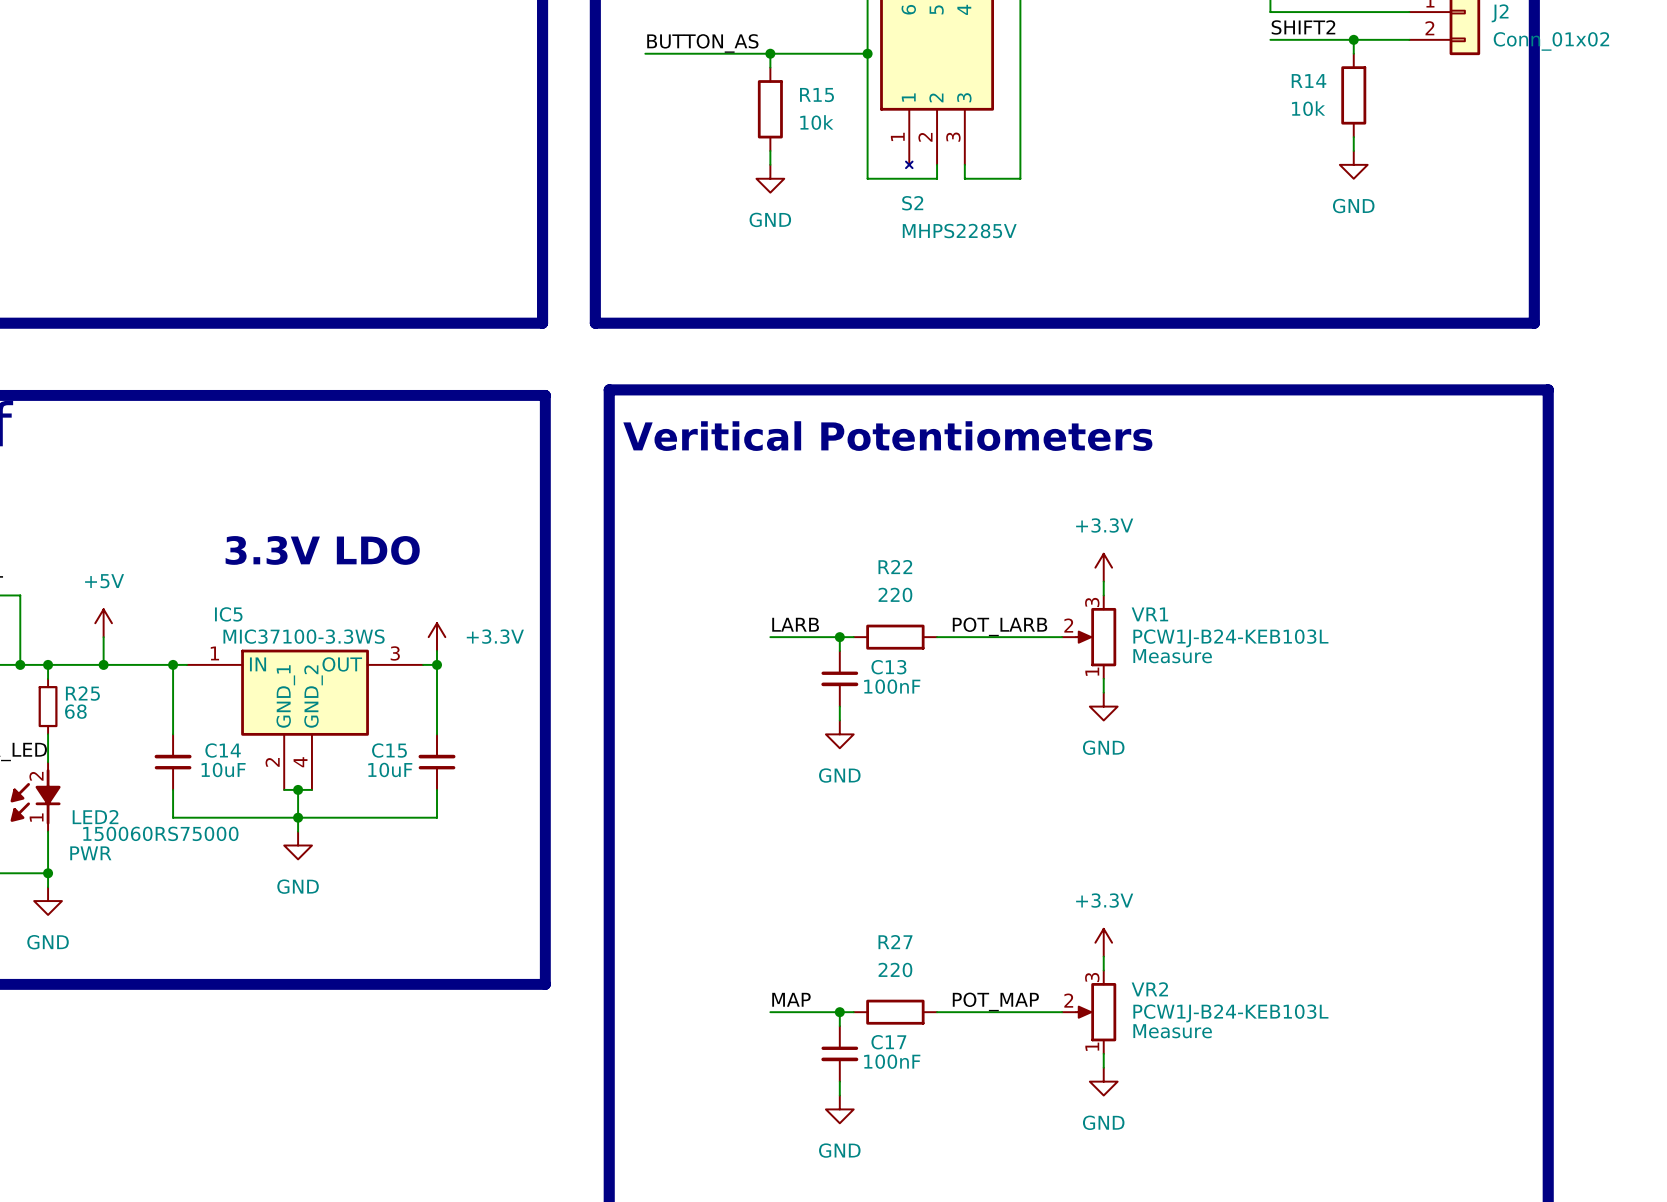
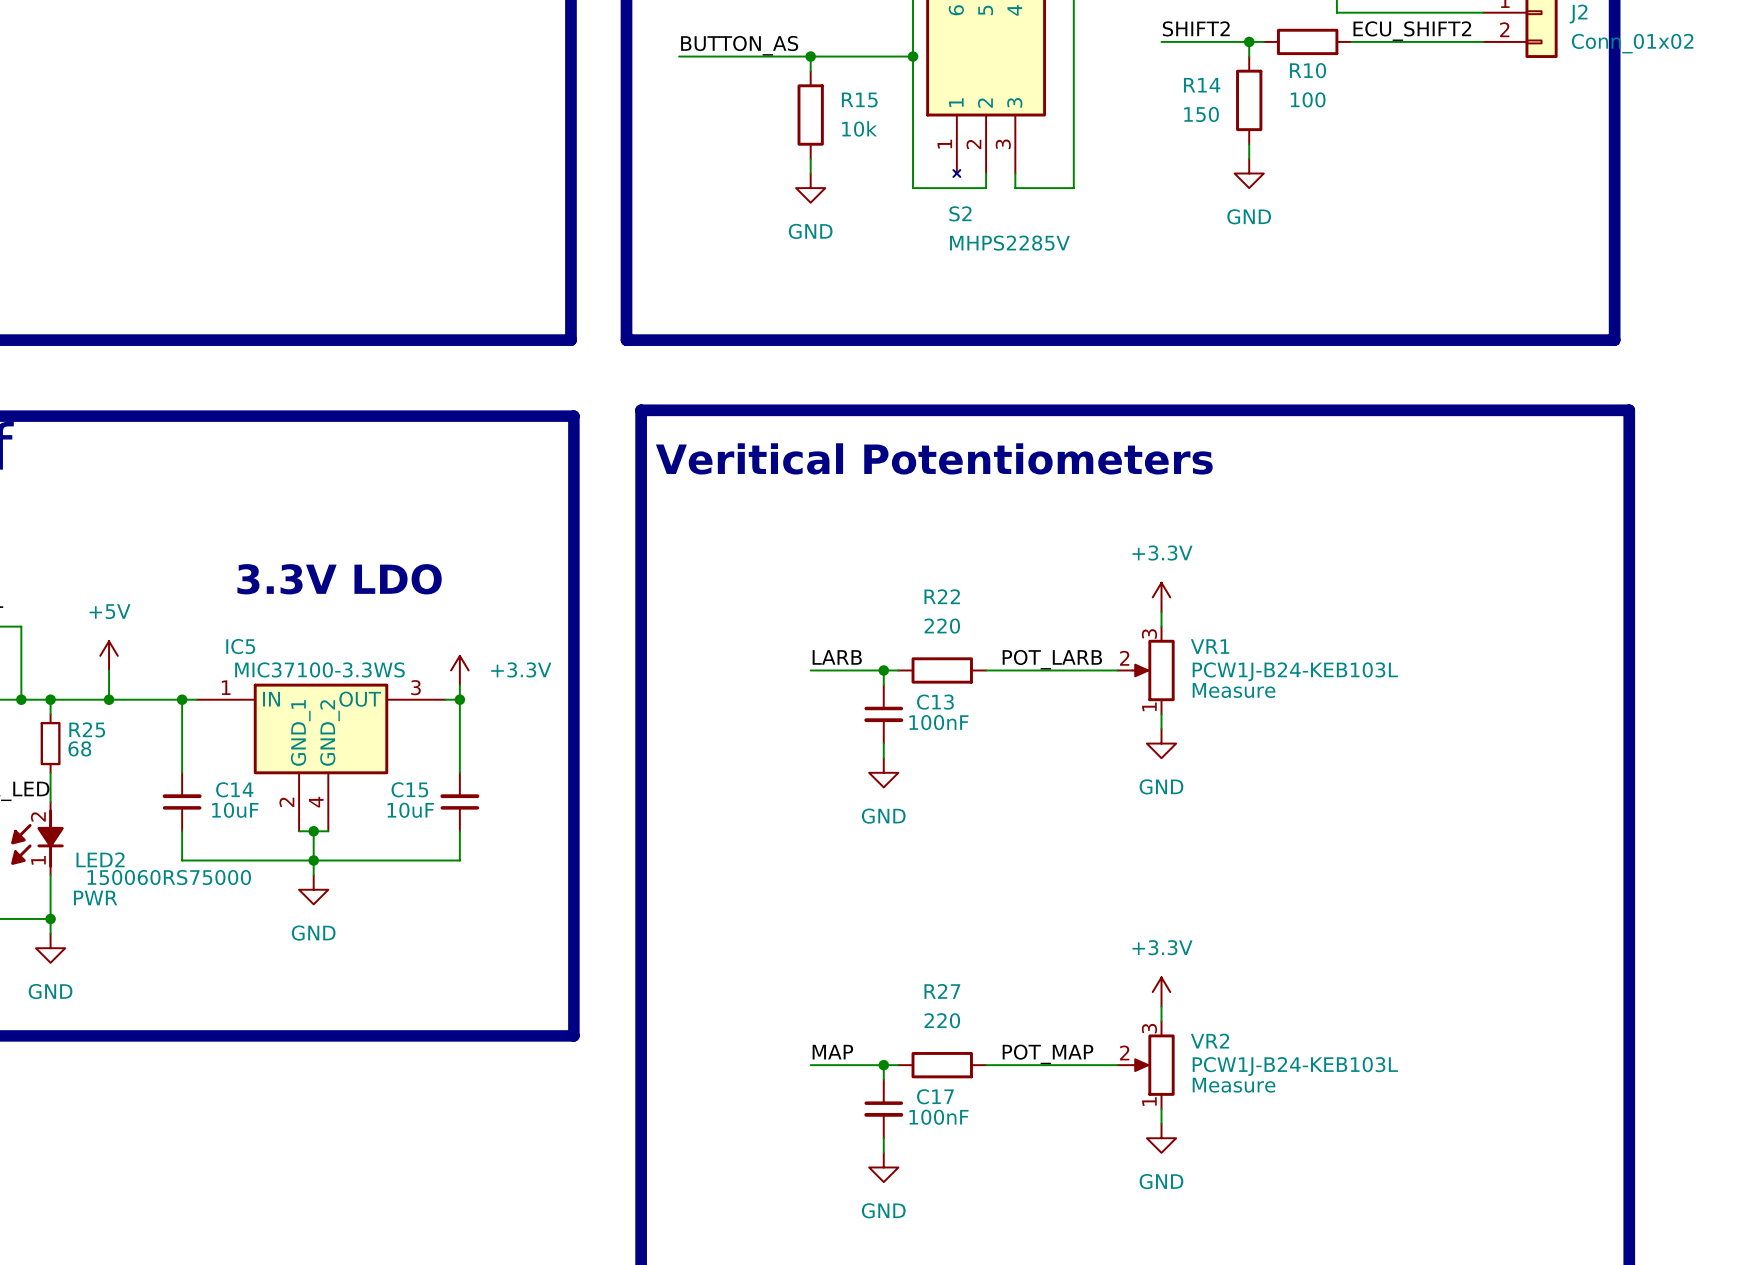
label position: SHIFT2 (1303, 27) -> SHIFT2 (1196, 28)
label: none -> ECU_SHIFT2 (1412, 31)
wire: none -> (1161, 41) (1263, 41)
junction: none -> (1249, 41)
R10: none -> 100 (1307, 41)
wire: (1353, 39) (1353, 53) -> (1249, 41) (1249, 56)
junction: (1353, 39) -> none
R14 position: (1353, 95) -> (1249, 100)
R14 value: 10k (1308, 108) -> 150 (1201, 114)
wire: (1353, 137) (1353, 150) -> (1249, 144) (1249, 158)
power symbol position: GND (1353, 164) -> GND (1249, 173)

